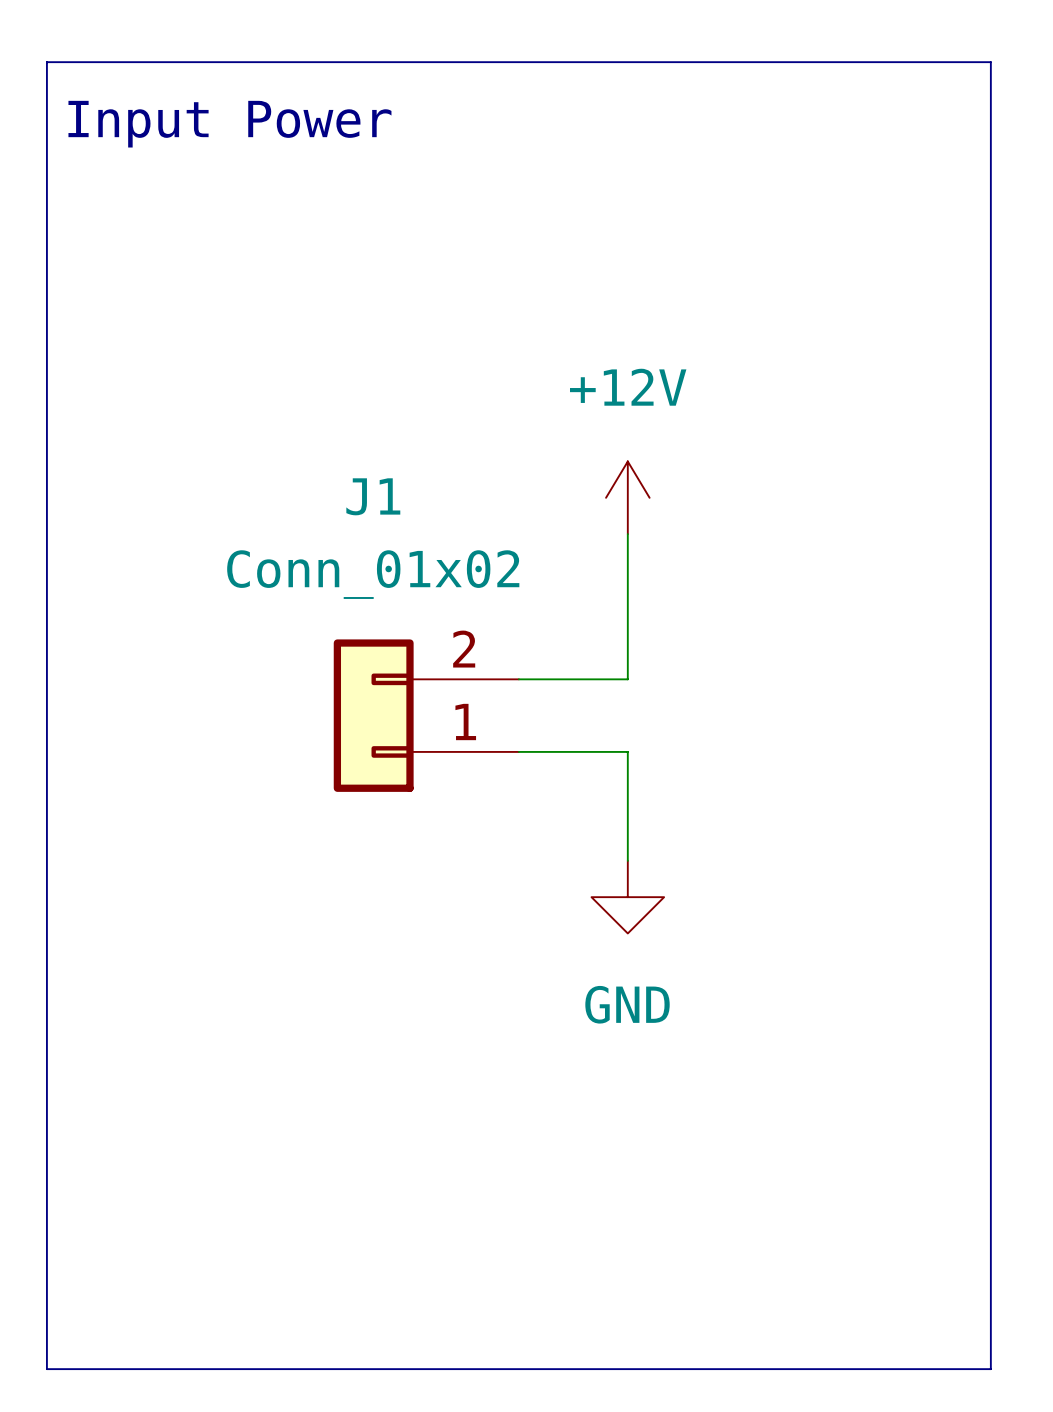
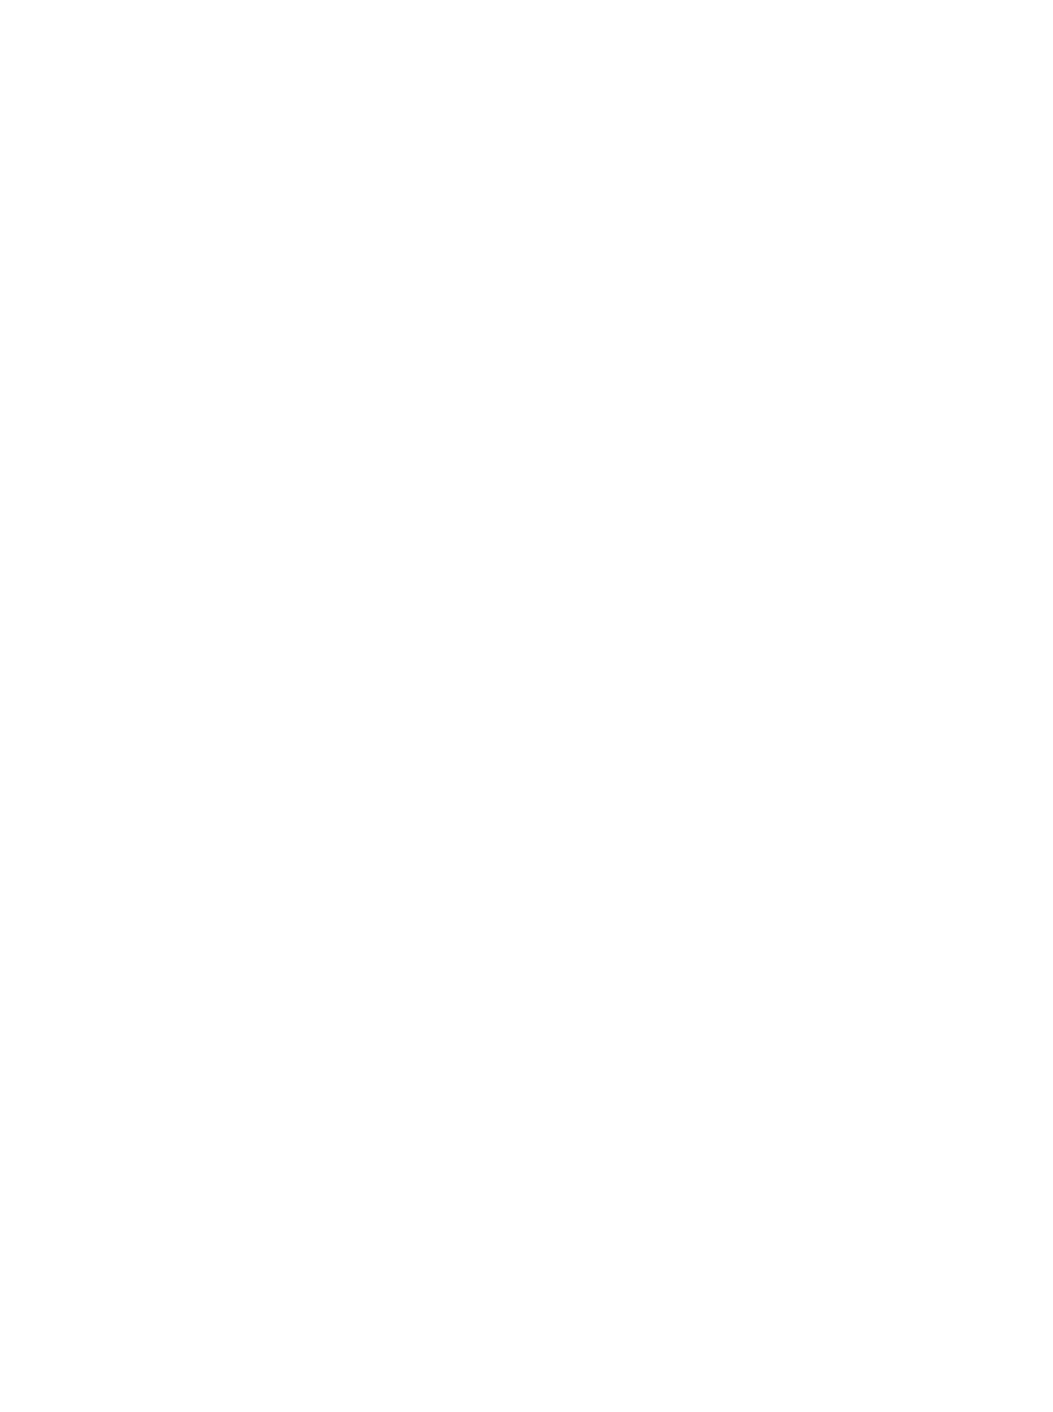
line: (46, 62) (990, 62) (990, 1369) (46, 1369) (46, 62) -> none
text: Input Power (229, 124) -> none
power symbol: +12V (627, 497) -> none
wire: (627, 534) (627, 679) (518, 679) -> none
J1: Conn_01x02 (426, 715) -> none
wire: (518, 751) (627, 751) (627, 860) -> none
power symbol: GND (627, 897) -> none

